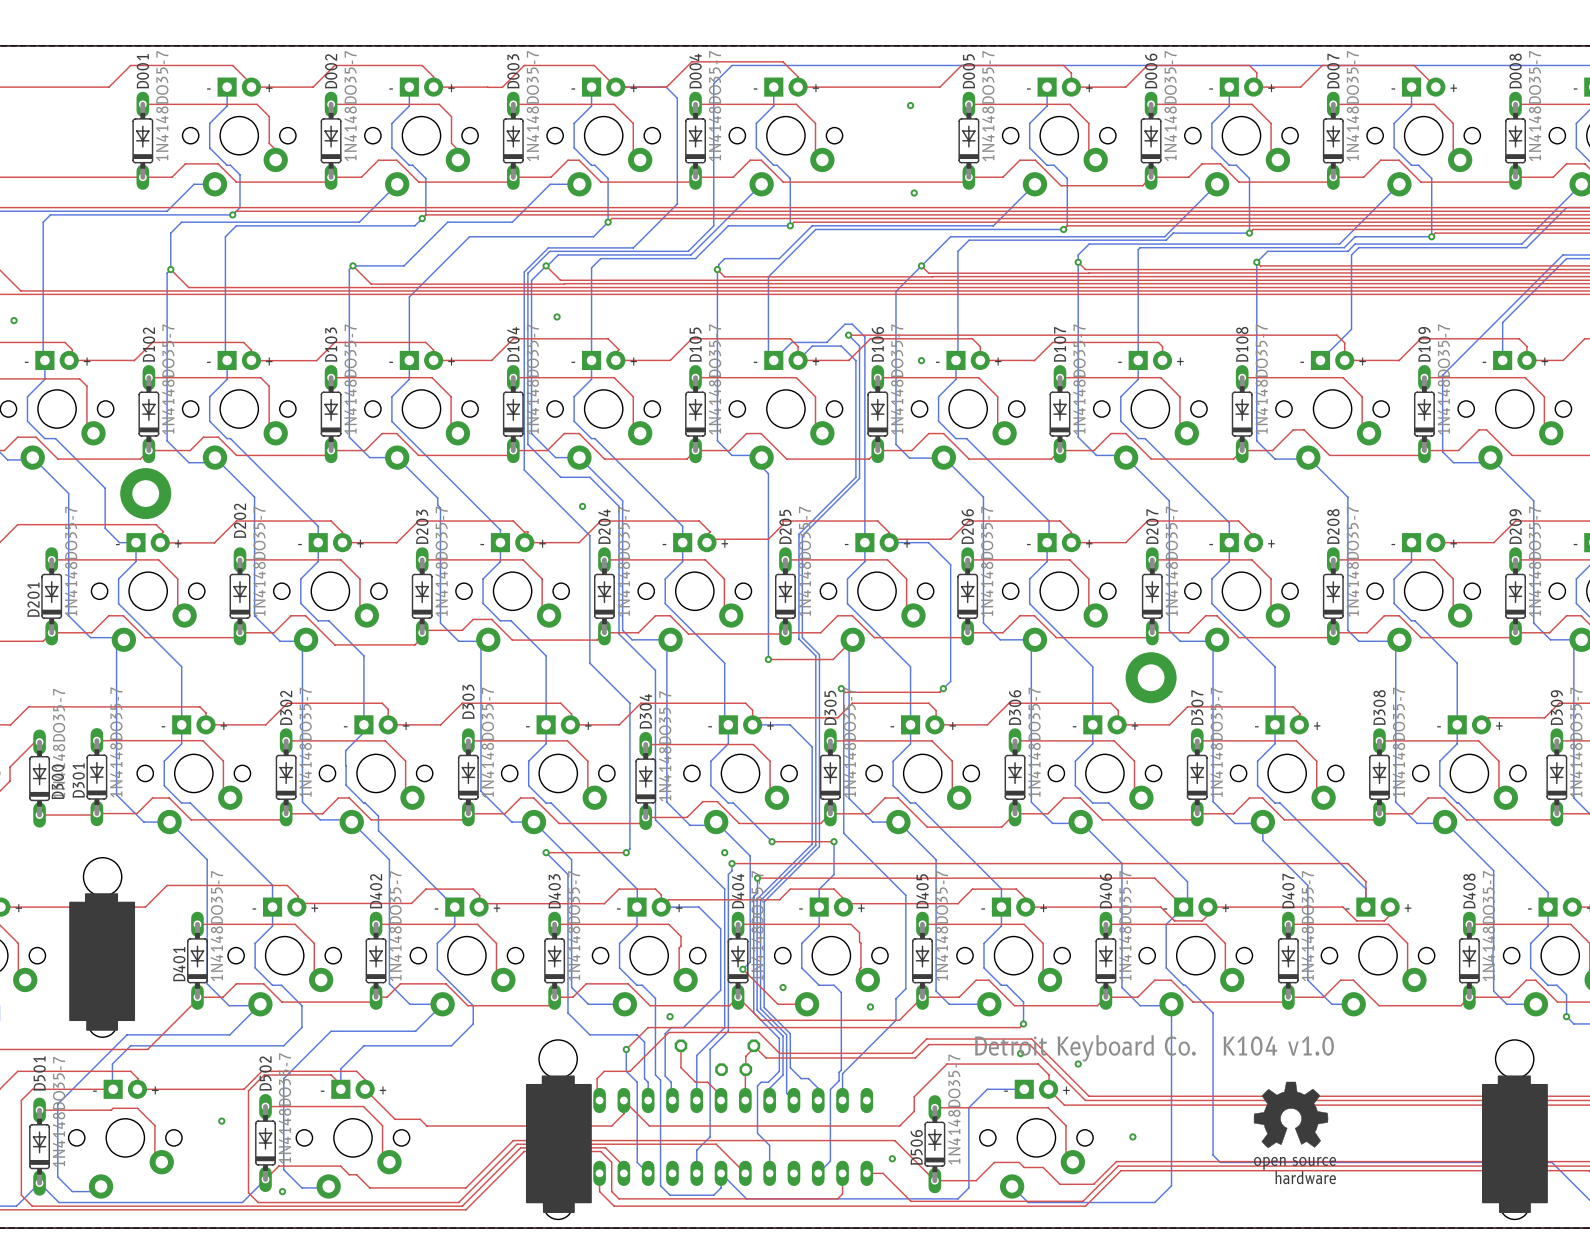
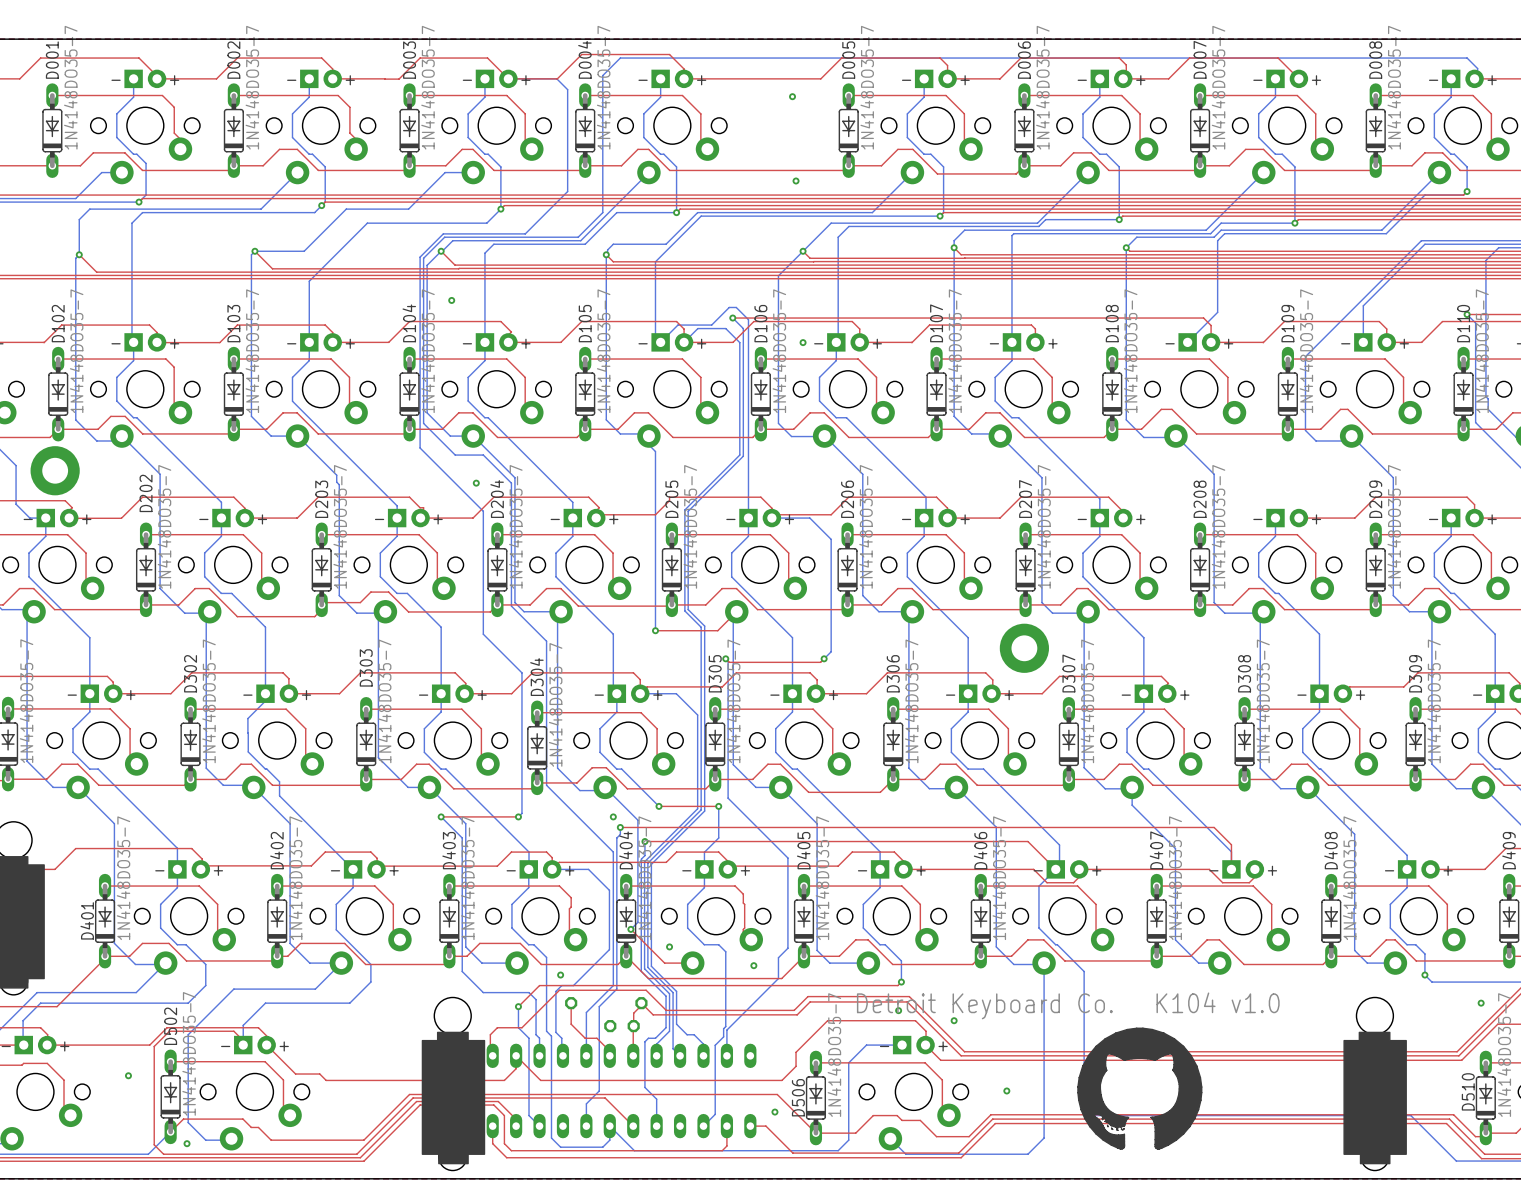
drawing: none -> [1077, 1028, 1202, 1149]
line: none -> (1136, 1028) (1152, 1029) (1174, 1038) (1191, 1055) (1200, 1077) (1200, 1100) (1194, 1118) (1176, 1140) (1158, 1148) (1155, 1147) (1154, 1124) (1151, 1117) (1166, 1113) (1176, 1101) (1179, 1084) (1172, 1070) (1172, 1053) (1155, 1060) (1139, 1058) (1124, 1060) (1107, 1053) (1106, 1070) (1100, 1084) (1102, 1101) (1113, 1113) (1128, 1117) (1124, 1125) (1116, 1127) (1111, 1125) (1101, 1115) (1094, 1115) (1107, 1132) (1113, 1134) (1124, 1134) (1124, 1146) (1122, 1148) (1111, 1145) (1096, 1133) (1084, 1118) (1078, 1100) (1079, 1077) (1088, 1055) (1105, 1038) (1115, 1033) (1136, 1028)
drawing: [1253, 1081, 1329, 1149] -> none
line: none -> (1103, 1118) (1102, 1119)
line: none -> (1107, 1125) (1108, 1126)
line: none -> (1111, 1128) (1112, 1129)
line: none -> (1117, 1128) (1118, 1130)
line: none -> (1124, 1128) (1123, 1129)
line: none -> (1121, 1129) (1122, 1129)

